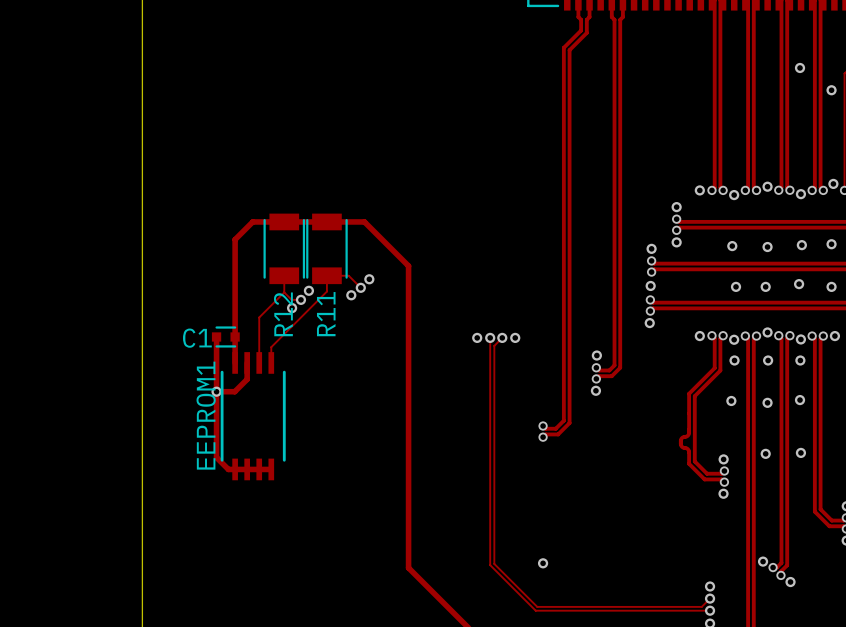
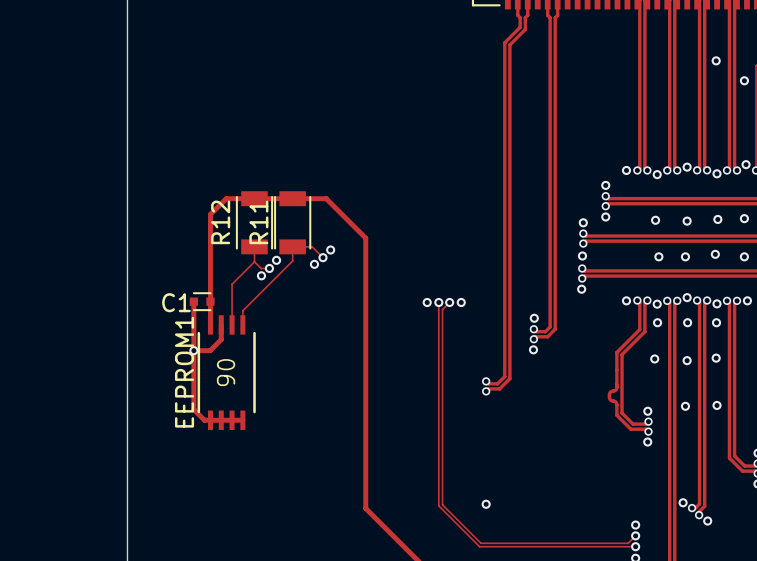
R12 name position: R12 (283, 314) -> R12 (220, 222)
R11 name position: R11 (326, 314) -> R11 (258, 222)
EEPROM1 text: none -> 90 (226, 372)

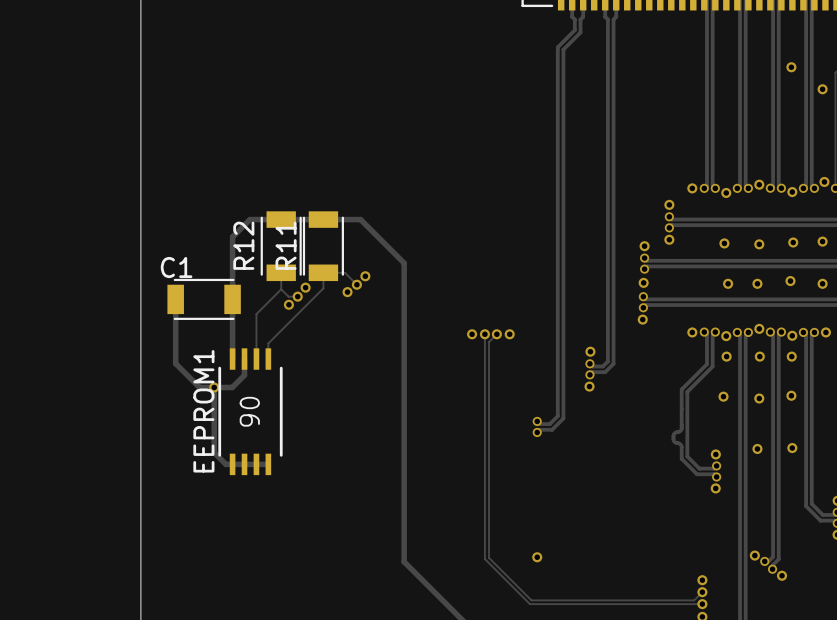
C1 footprint: [189, 292, 215, 312] -> [167, 278, 241, 320]
track: (193, 301) (193, 350) -> (175, 299) (175, 363) (199, 387) (214, 387)

